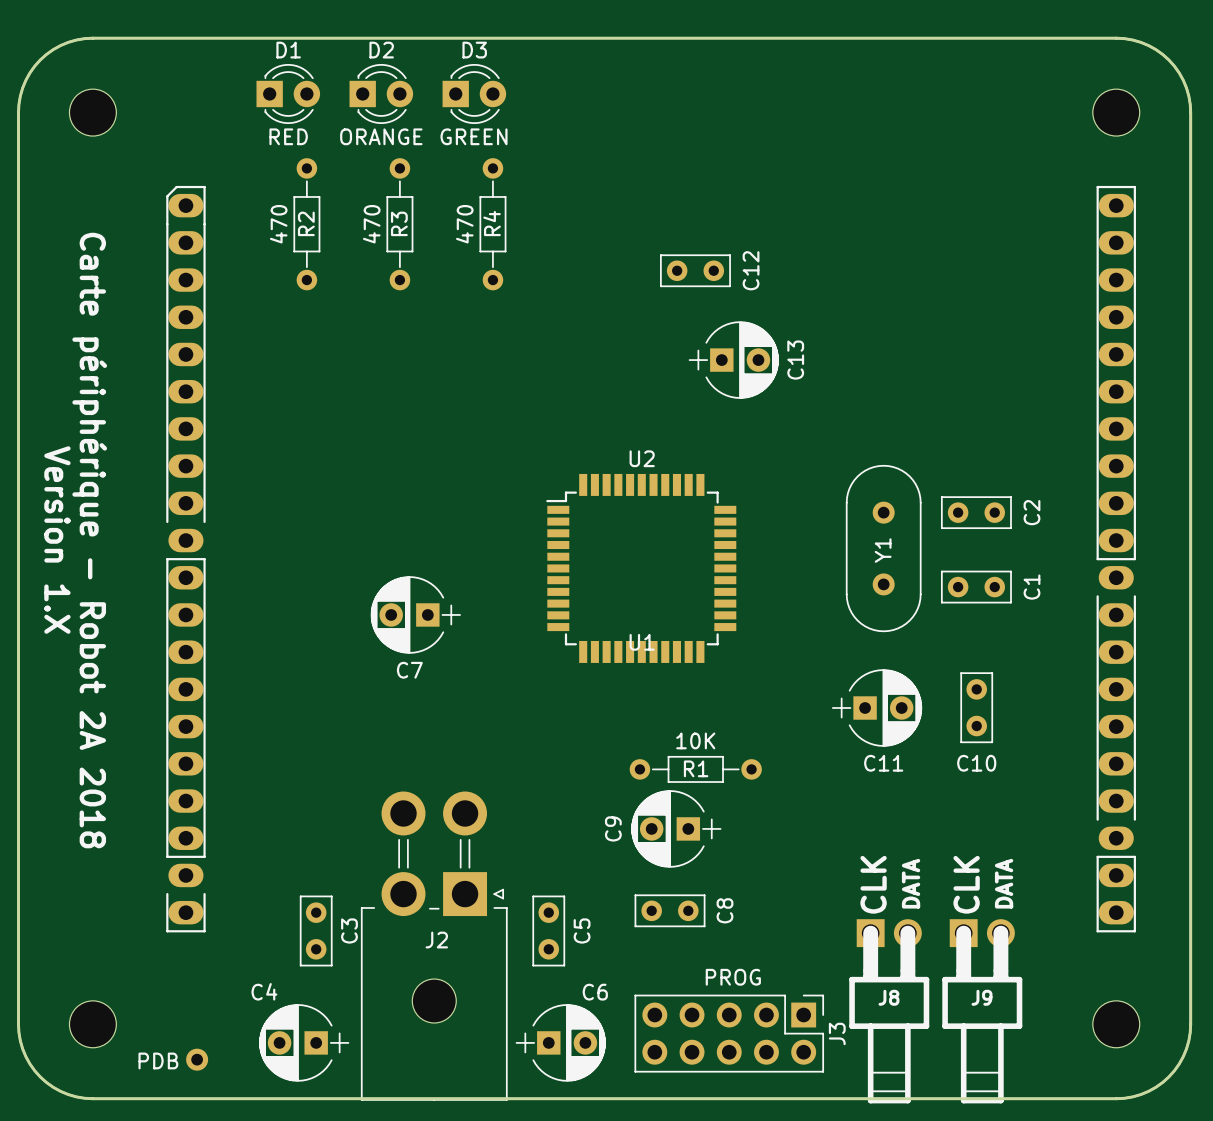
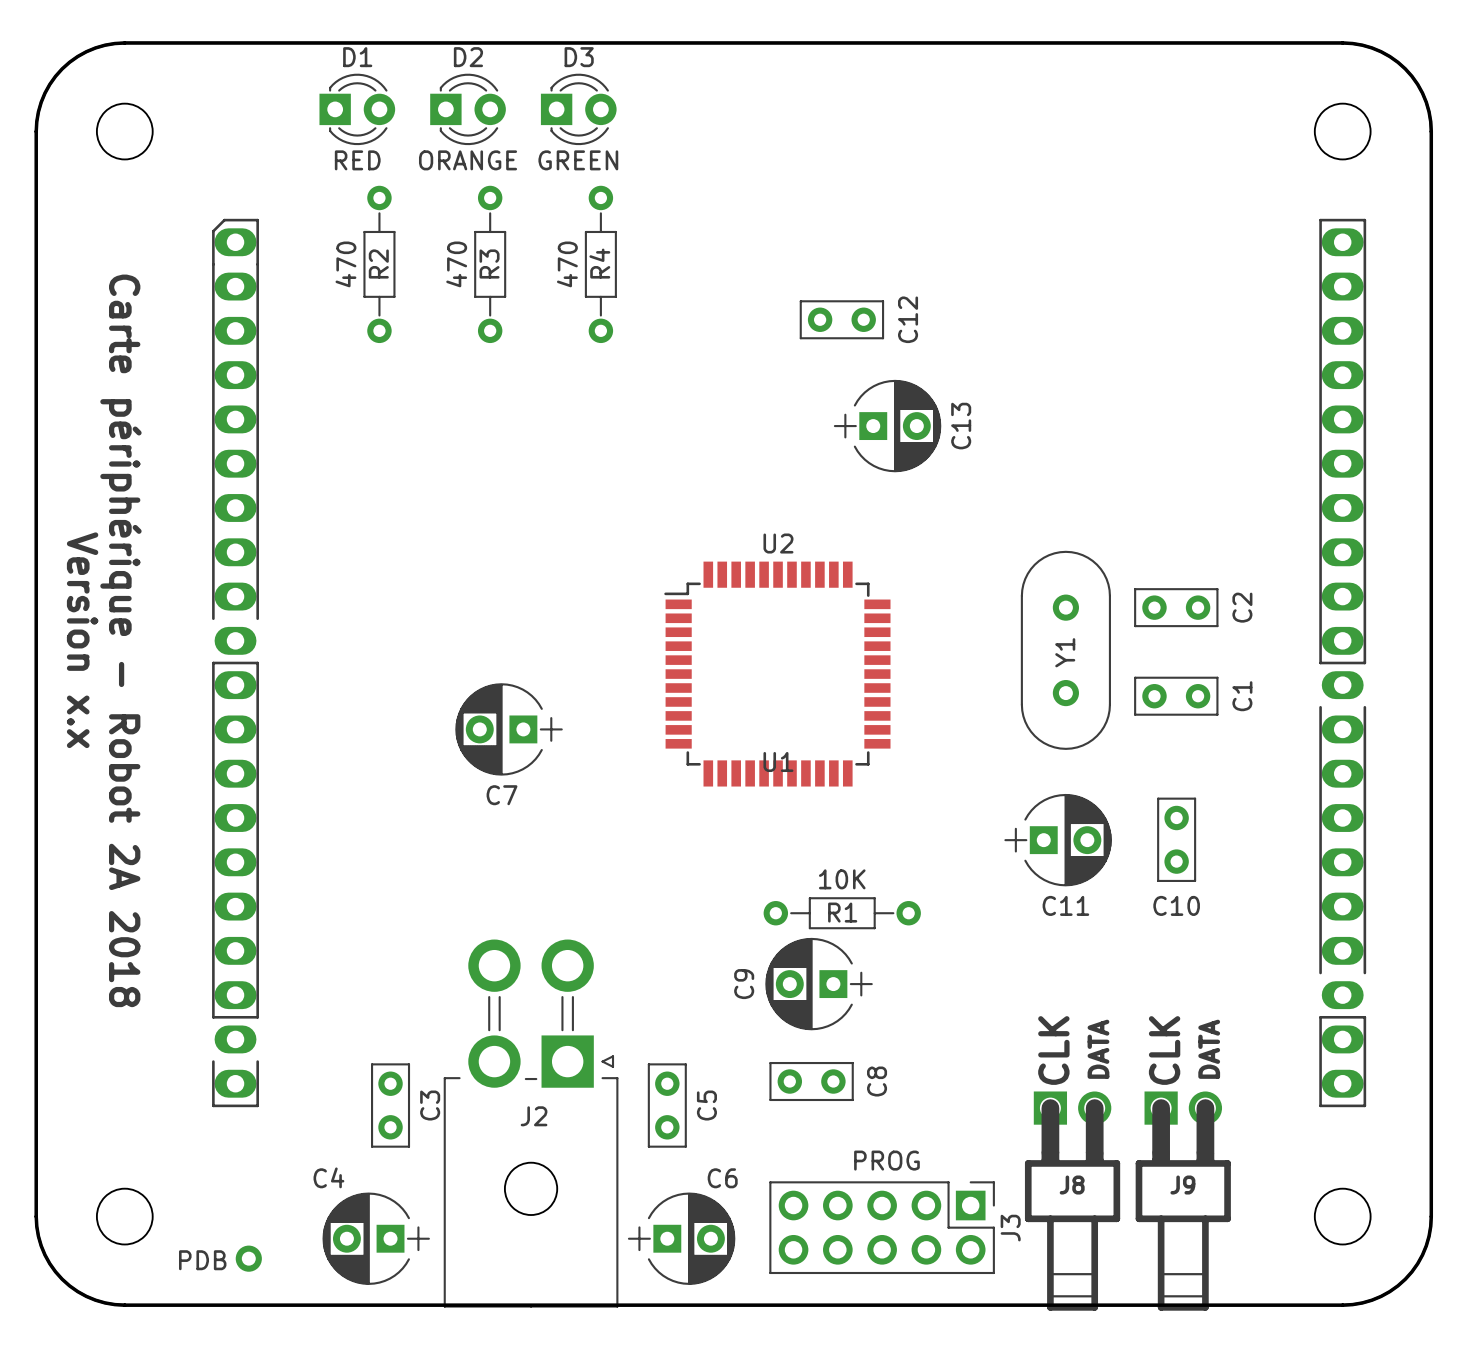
text: Version 1.X (57, 540) -> Version x.x (82, 640)

